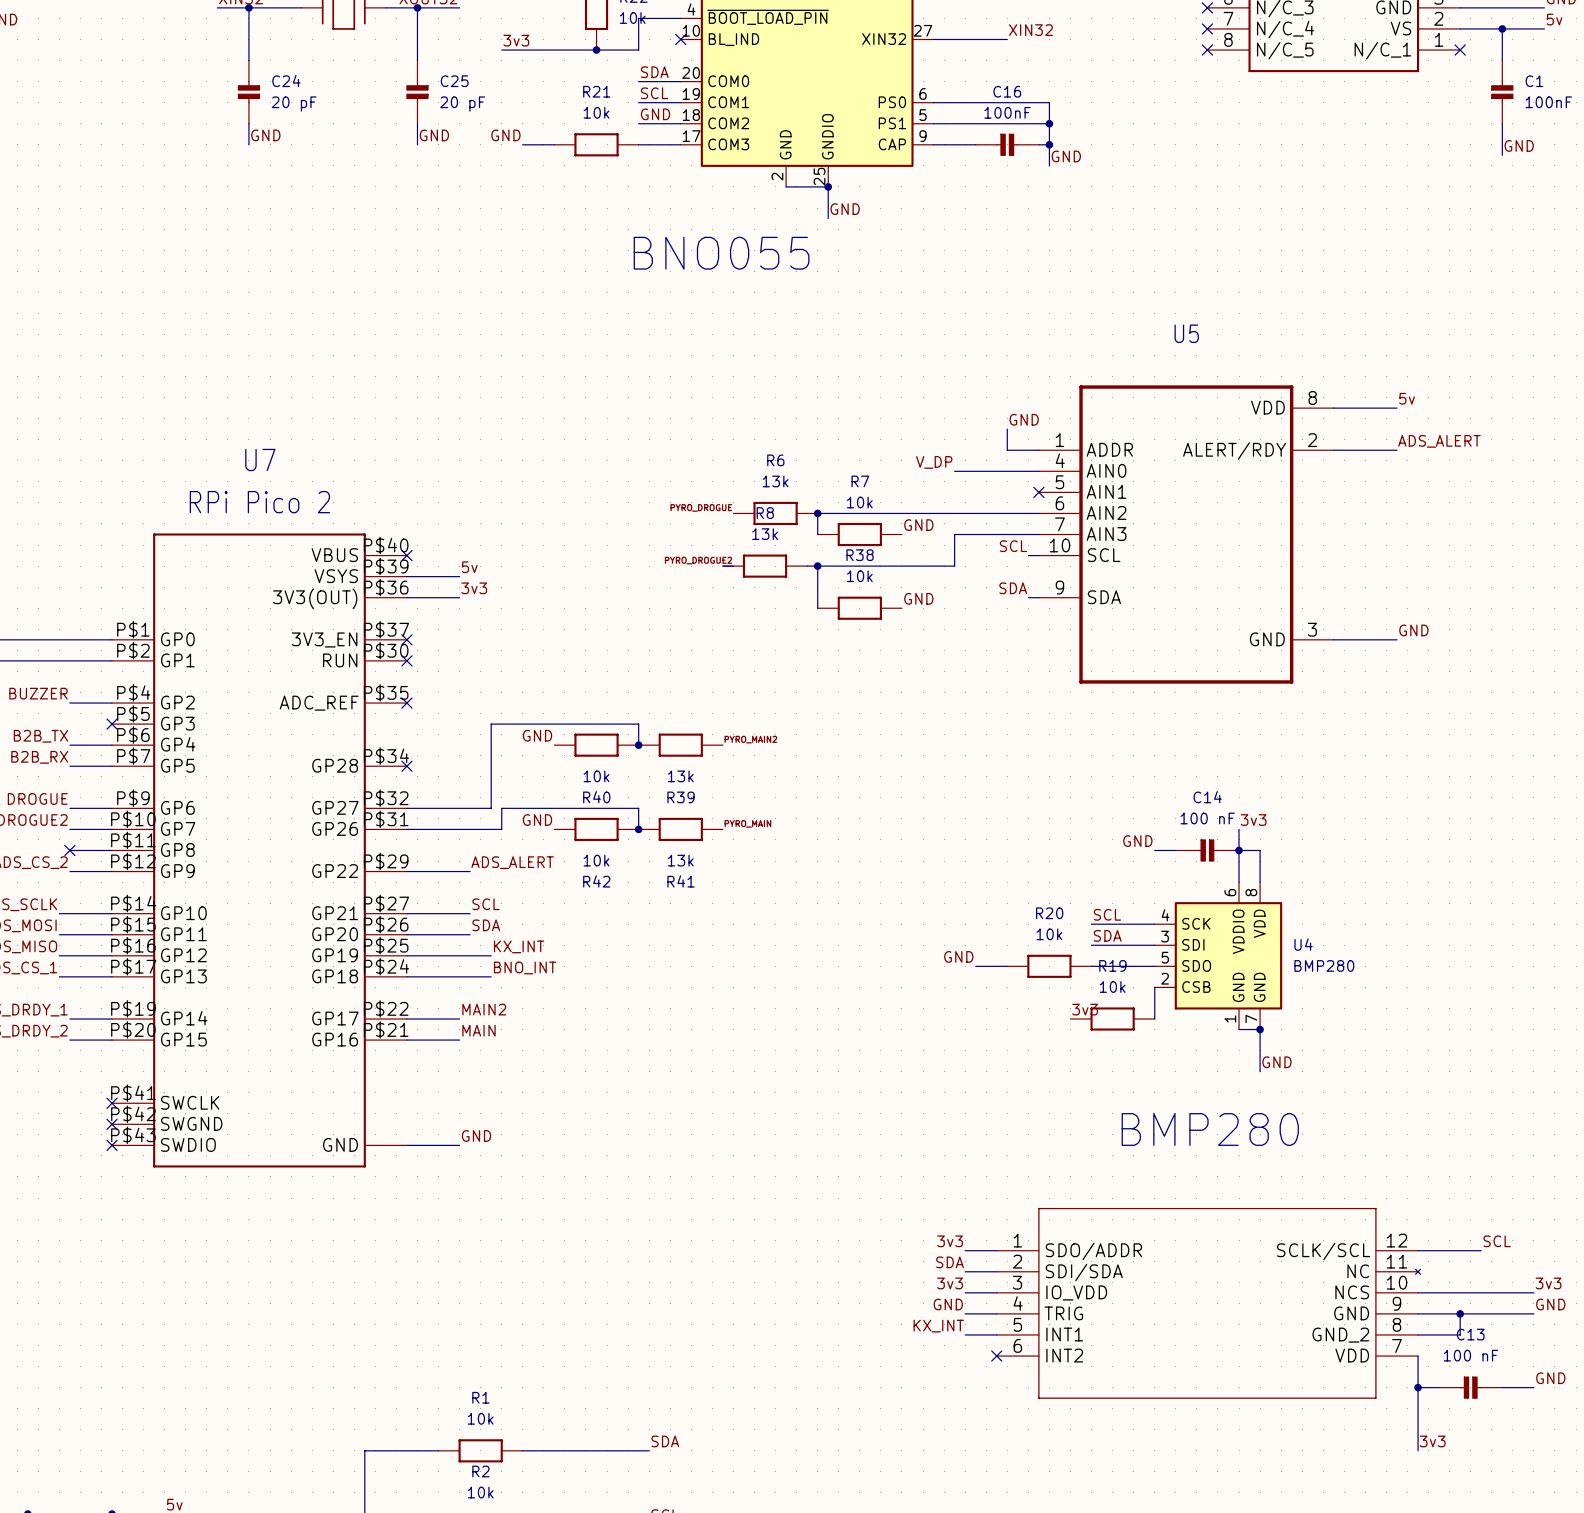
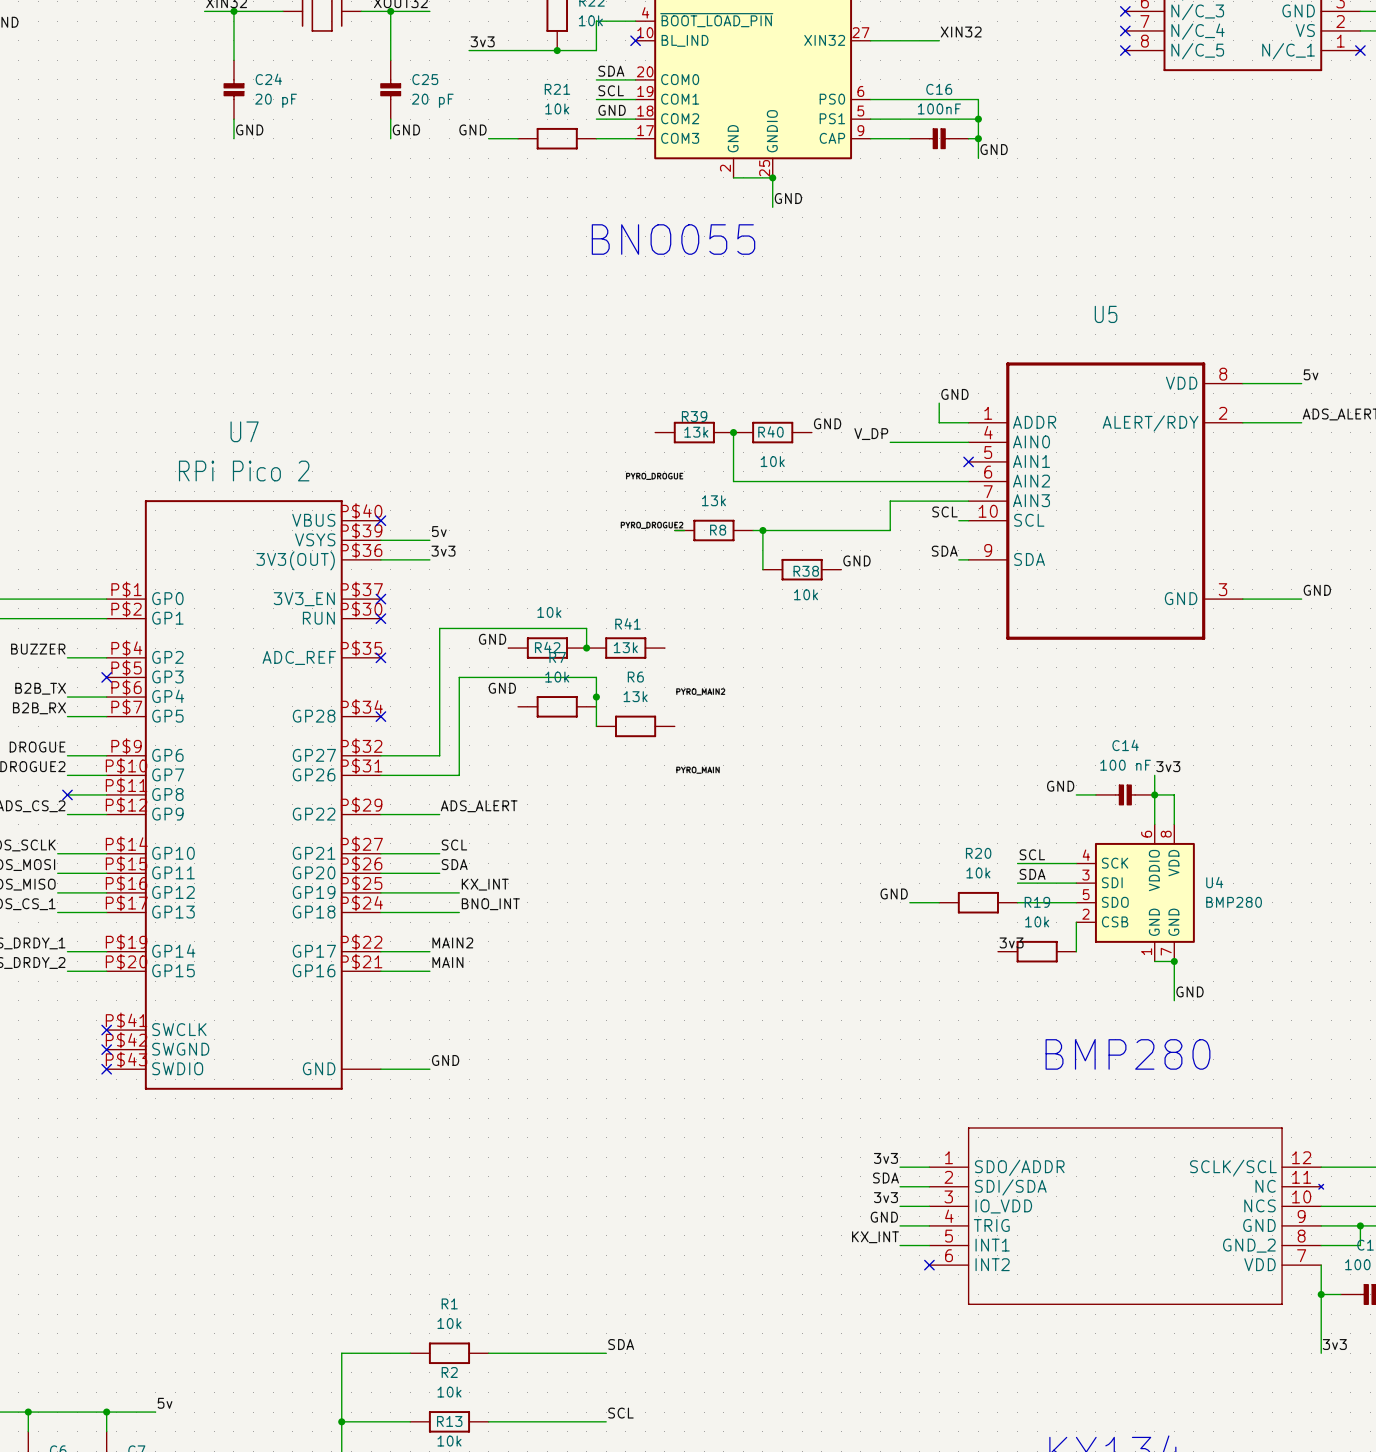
junction: none -> (733, 432)
R8 name position: R8 (765, 513) -> R8 (718, 530)
R6 position: (775, 513) -> (635, 726)
wire: (817, 513) (817, 534) -> (762, 481) (733, 481) (733, 432)
junction: (817, 513) -> none
label position: GND (918, 525) -> GND (827, 423)
R7 position: (859, 534) -> (557, 706)
R38 name position: R38 (860, 555) -> R38 (806, 571)
R38 value position: 10k (859, 576) -> 10k (806, 594)
wire: none -> (586, 648) (586, 628) (439, 628) (439, 755)
junction: none -> (586, 648)
R40 position: (596, 745) -> (772, 432)
wire: none -> (596, 697) (596, 726)
R39 position: (680, 745) -> (694, 432)
R39 value position: 13k (680, 776) -> 13k (696, 432)
R40 name position: R40 (596, 797) -> R40 (770, 431)
R39 name position: R39 (681, 797) -> R39 (694, 416)
wire: (470, 808) (491, 808) -> (459, 775) (459, 755)
label position: GND (537, 820) -> GND (492, 639)
wire: (491, 829) (501, 829) (501, 808) (638, 808) (638, 829) -> none
R42 position: (596, 829) -> (547, 648)
junction: (638, 829) -> none
R41 position: (680, 829) -> (625, 648)
R42 value position: 10k (596, 860) -> 10k (549, 612)
R41 value position: 13k (680, 860) -> 13k (625, 647)
R42 name position: R42 (596, 881) -> R42 (547, 647)
R41 name position: R41 (681, 881) -> R41 (627, 623)

